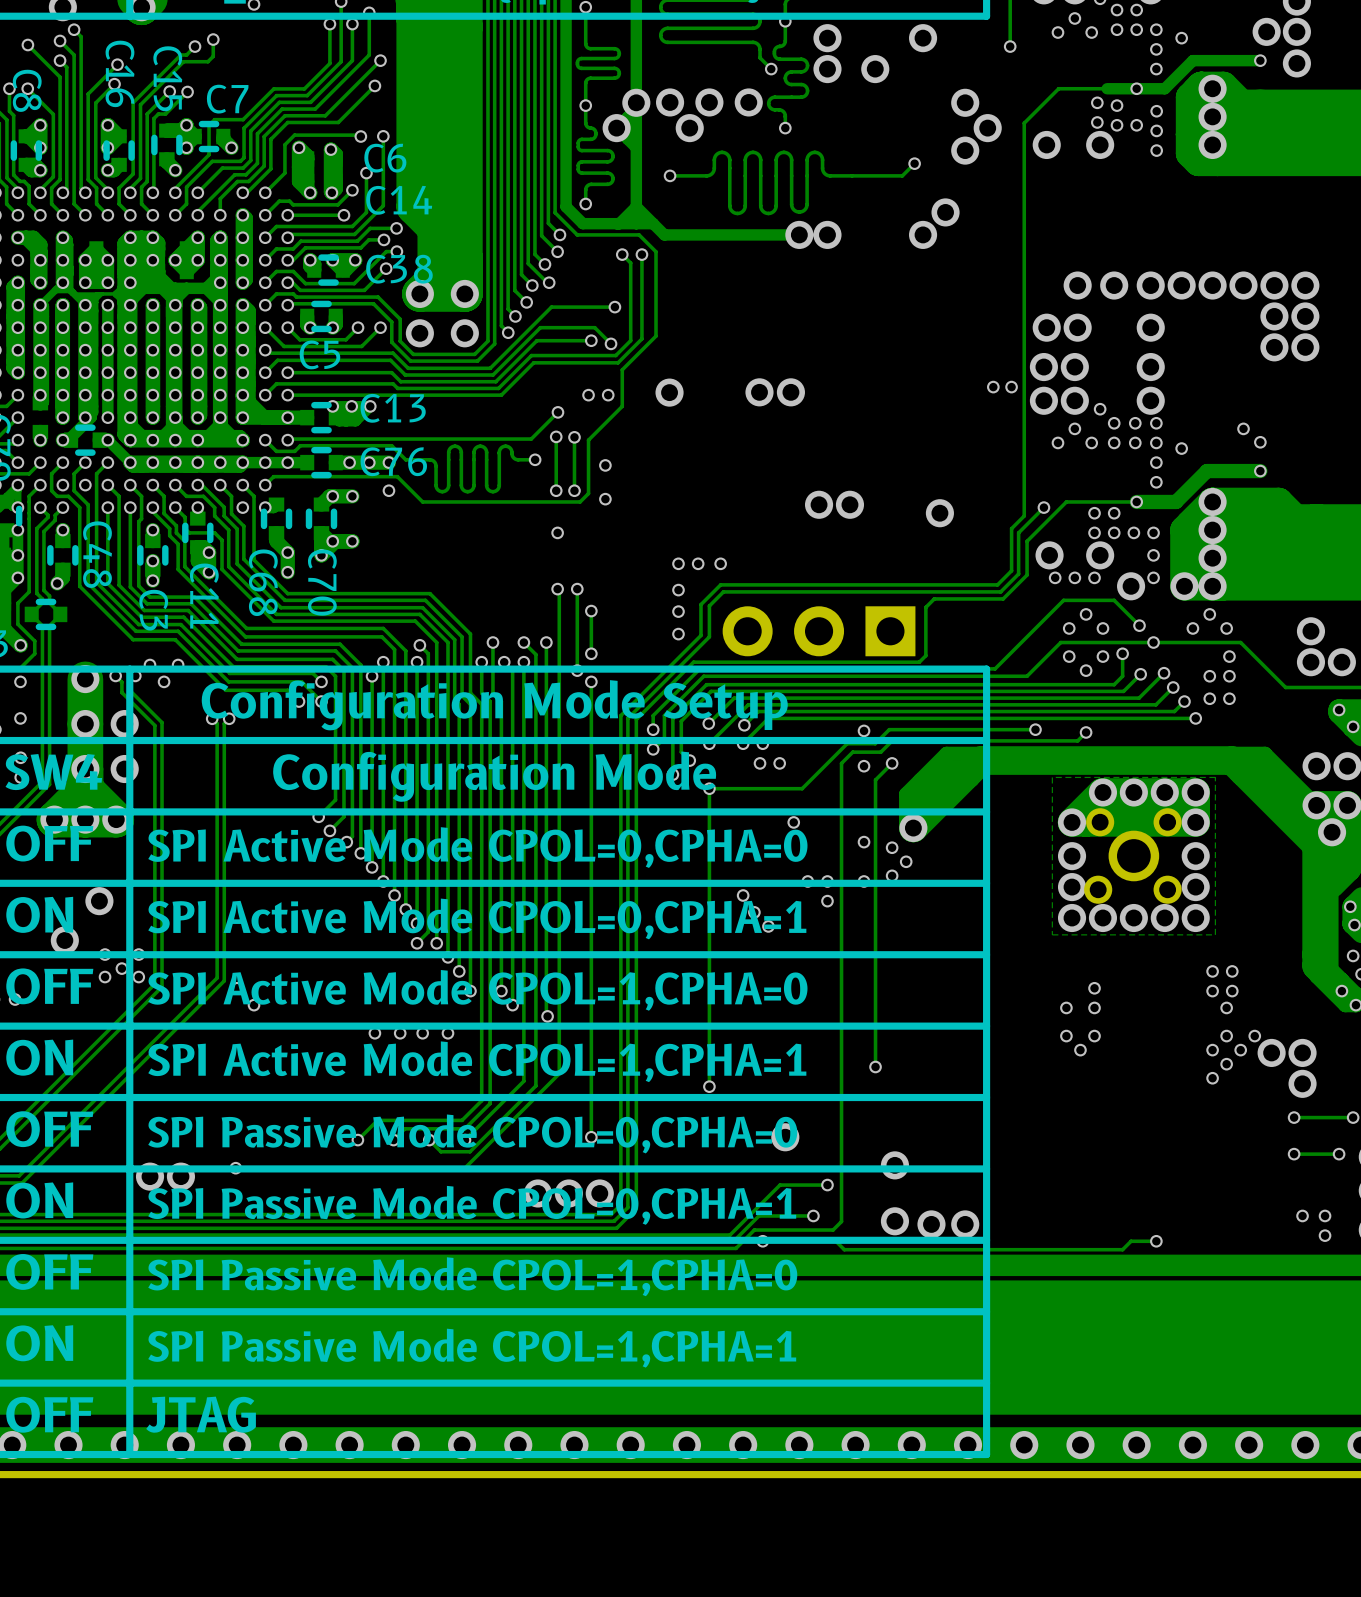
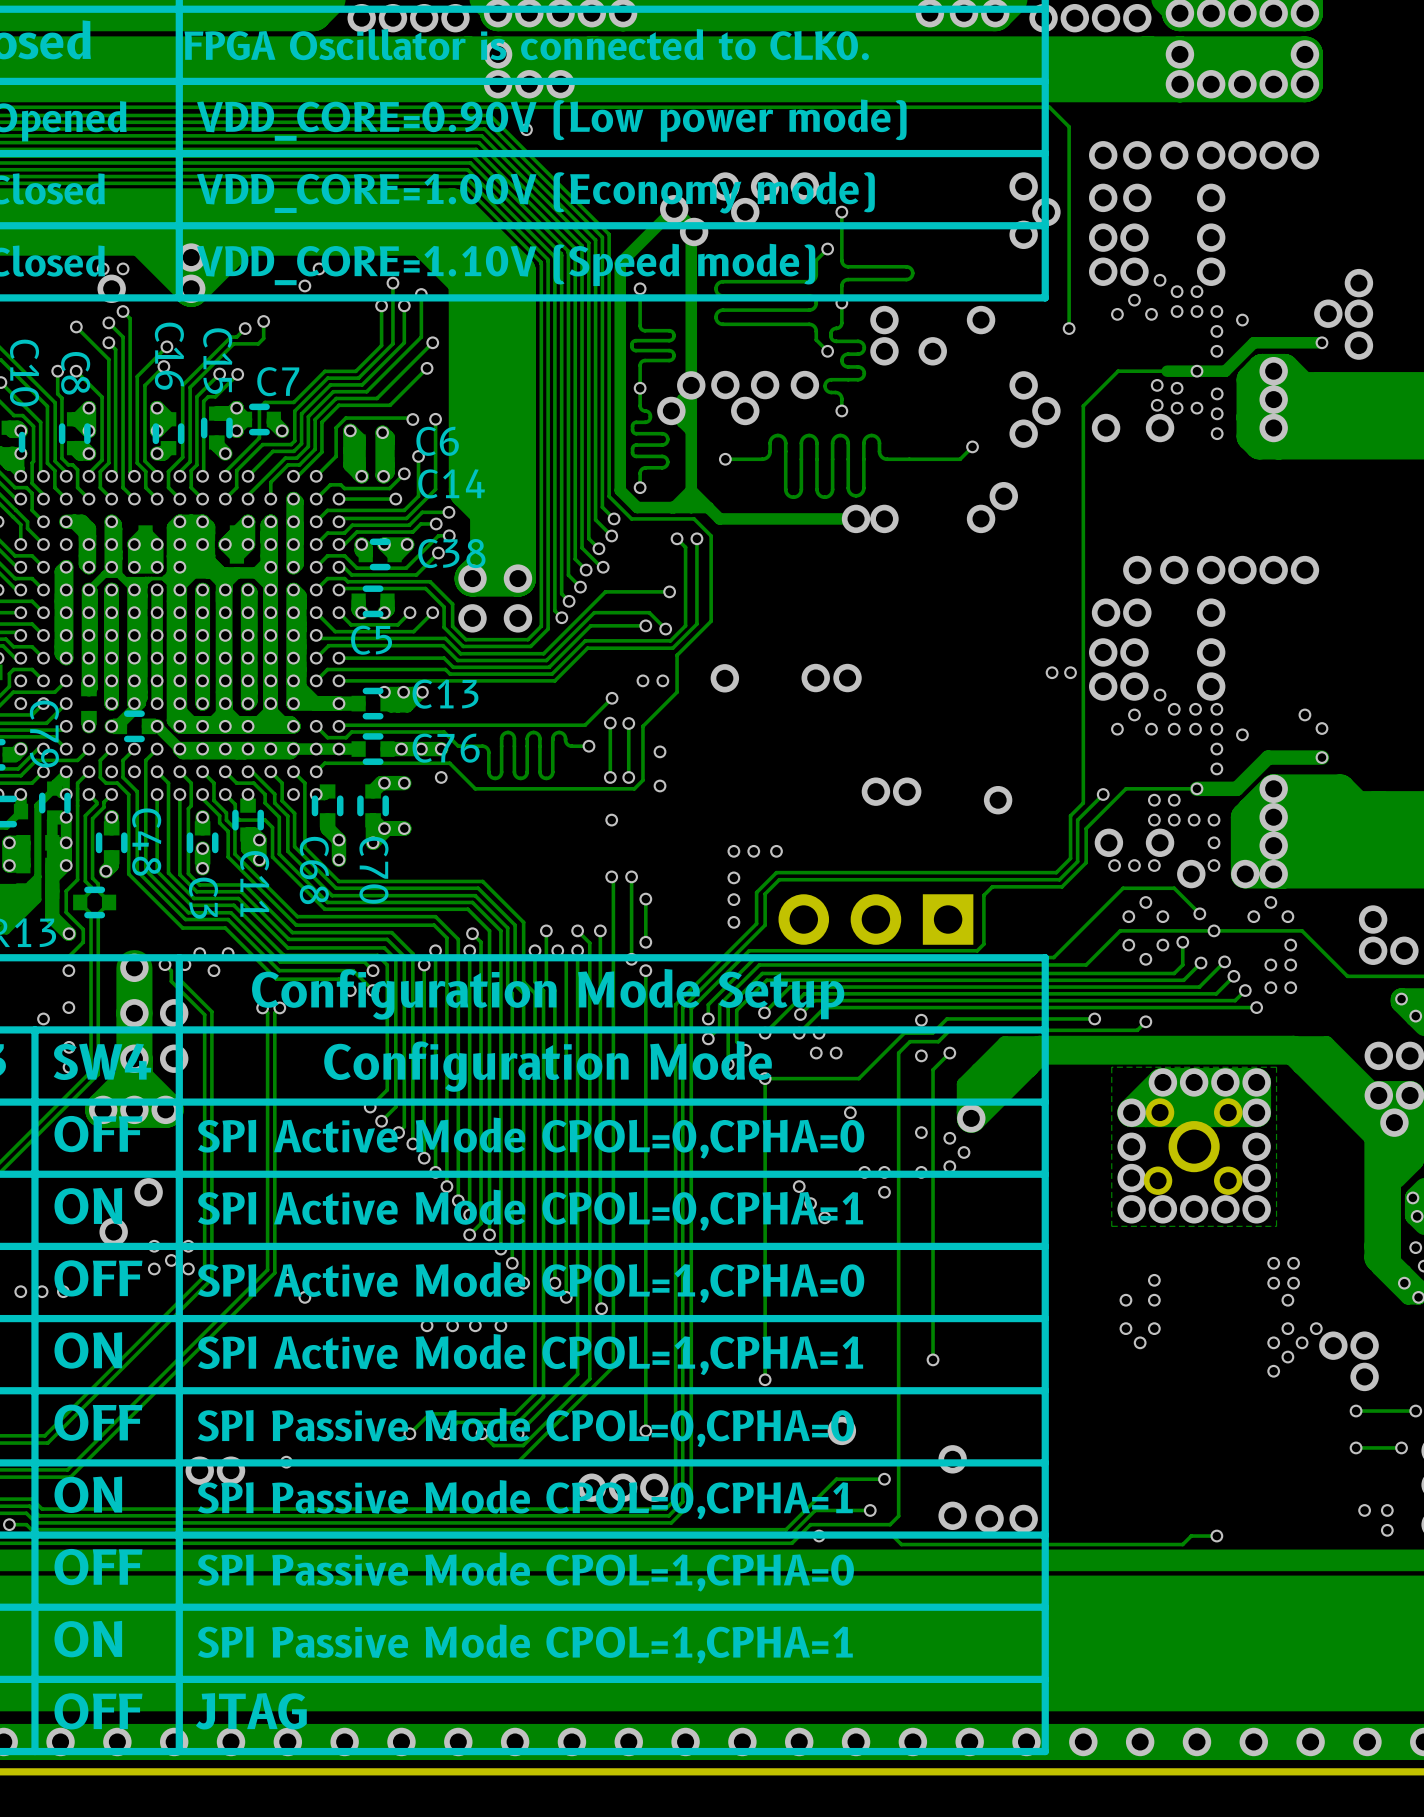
via: (1274, 285) -> none
via: (1305, 285) -> none
via: (1274, 316) -> none
via: (1305, 316) -> none
via: (1274, 347) -> none
via: (1305, 347) -> none

